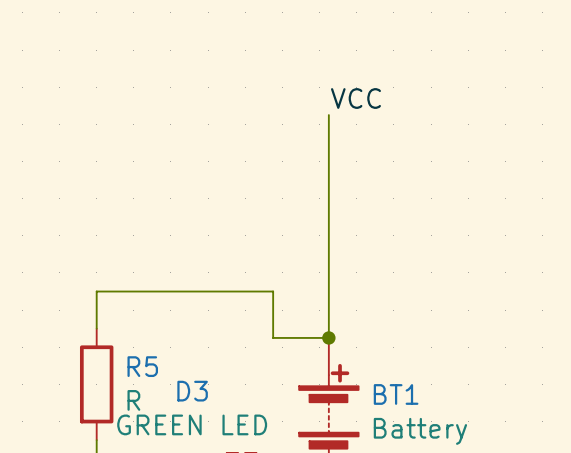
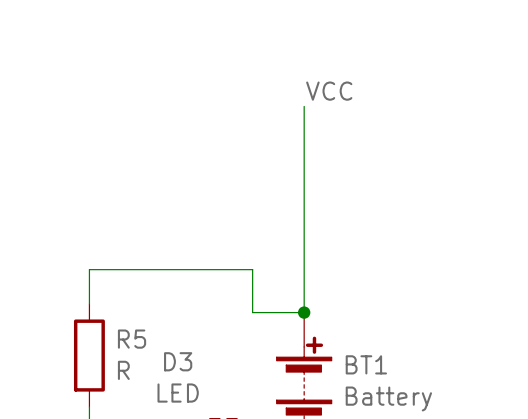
D3 value: GREEN LED (192, 424) -> LED (178, 393)

